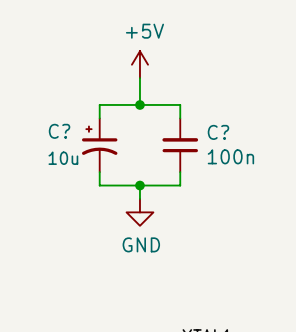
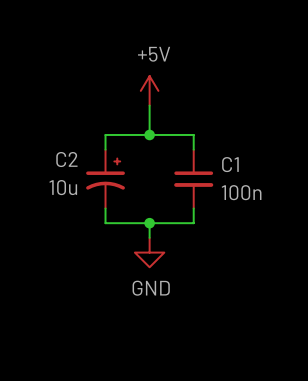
C?: 10u (99, 145) -> none
C2: none -> 10u (105, 179)
C?: 100n (180, 145) -> none
C1: none -> 100n (193, 179)

